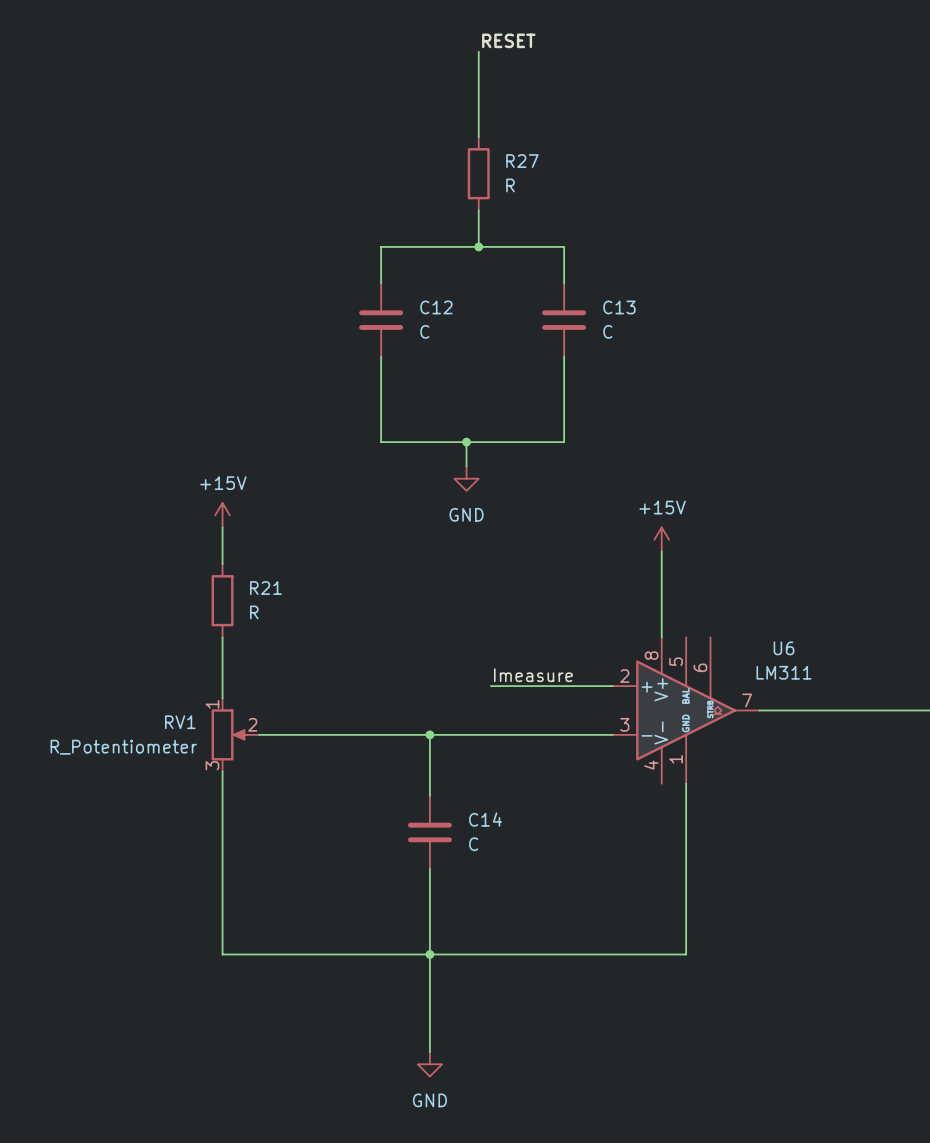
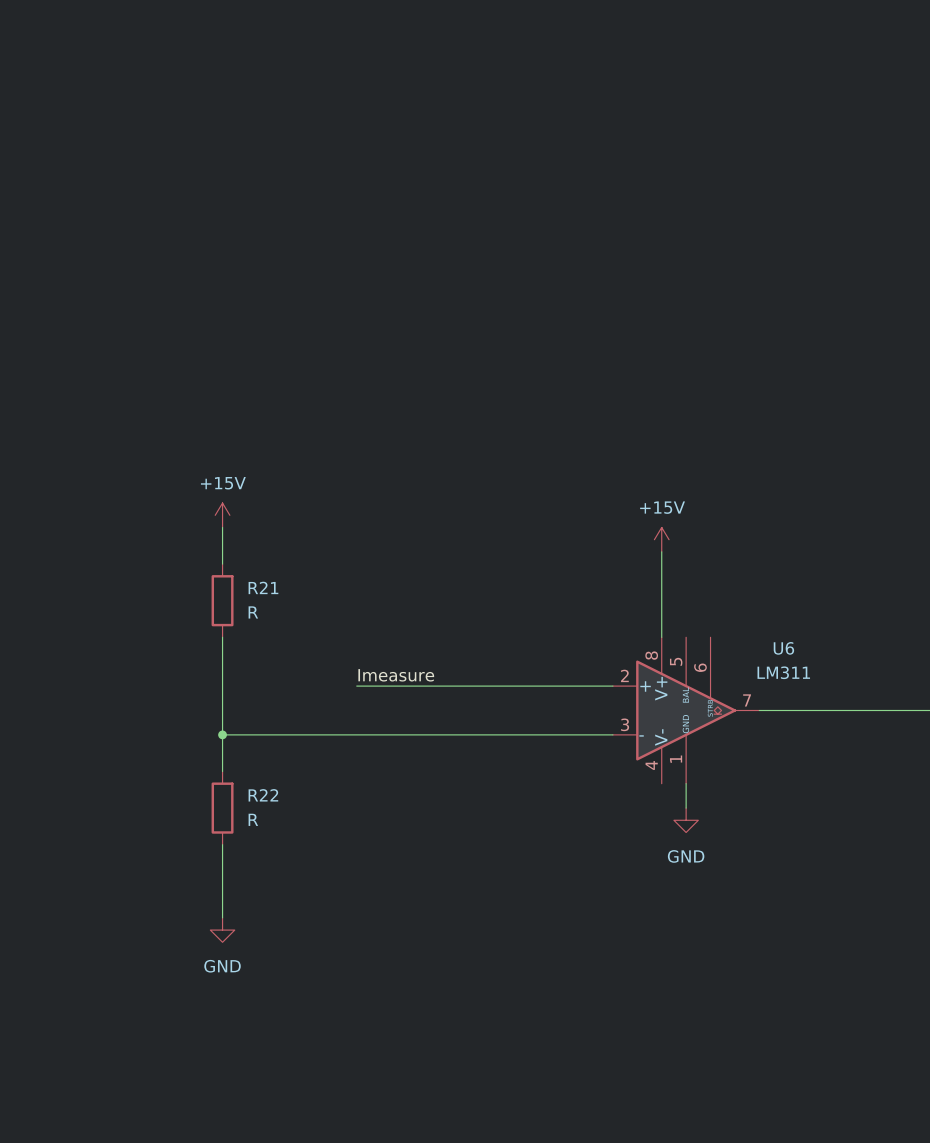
label: RESET (508, 40) -> none
wire: (478, 51) (478, 137) -> none
R27: R (478, 173) -> none
wire: (478, 210) (478, 246) -> none
junction: (478, 246) -> none
wire: (381, 283) (381, 246) (564, 246) (564, 283) -> none
C12: C (381, 320) -> none
C13: C (564, 320) -> none
wire: (381, 356) (381, 442) (564, 442) (564, 356) -> none
wire: (466, 442) (466, 466) -> none
junction: (466, 442) -> none
power symbol: GND (466, 478) -> none
label position: Imeasure (533, 675) -> Imeasure (396, 675)
wire: none -> (356, 686) (490, 686)
junction: none -> (222, 734)
RV1: R_Potentiometer (235, 734) -> none
wire: (429, 734) (429, 795) -> none
junction: (429, 734) -> none
wire: (222, 771) (222, 844) -> (222, 771) (222, 698)
R22: none -> R (222, 808)
wire: (686, 808) (686, 954) (222, 954) (222, 917) -> none
power symbol: none -> GND (686, 820)
C14: C (429, 832) -> none
wire: (429, 869) (429, 1052) -> none
power symbol: none -> GND (222, 930)
junction: (429, 954) -> none
power symbol: GND (429, 1064) -> none

